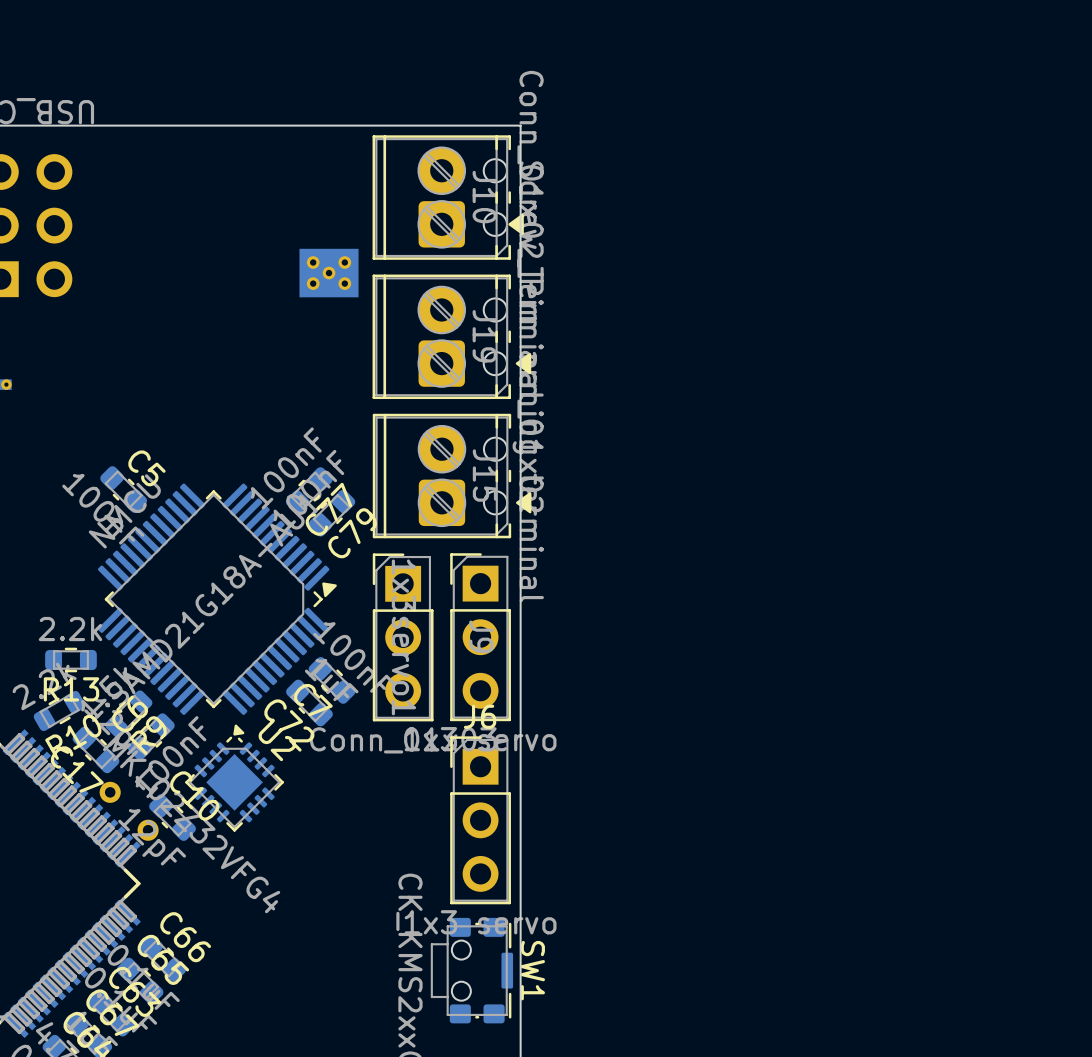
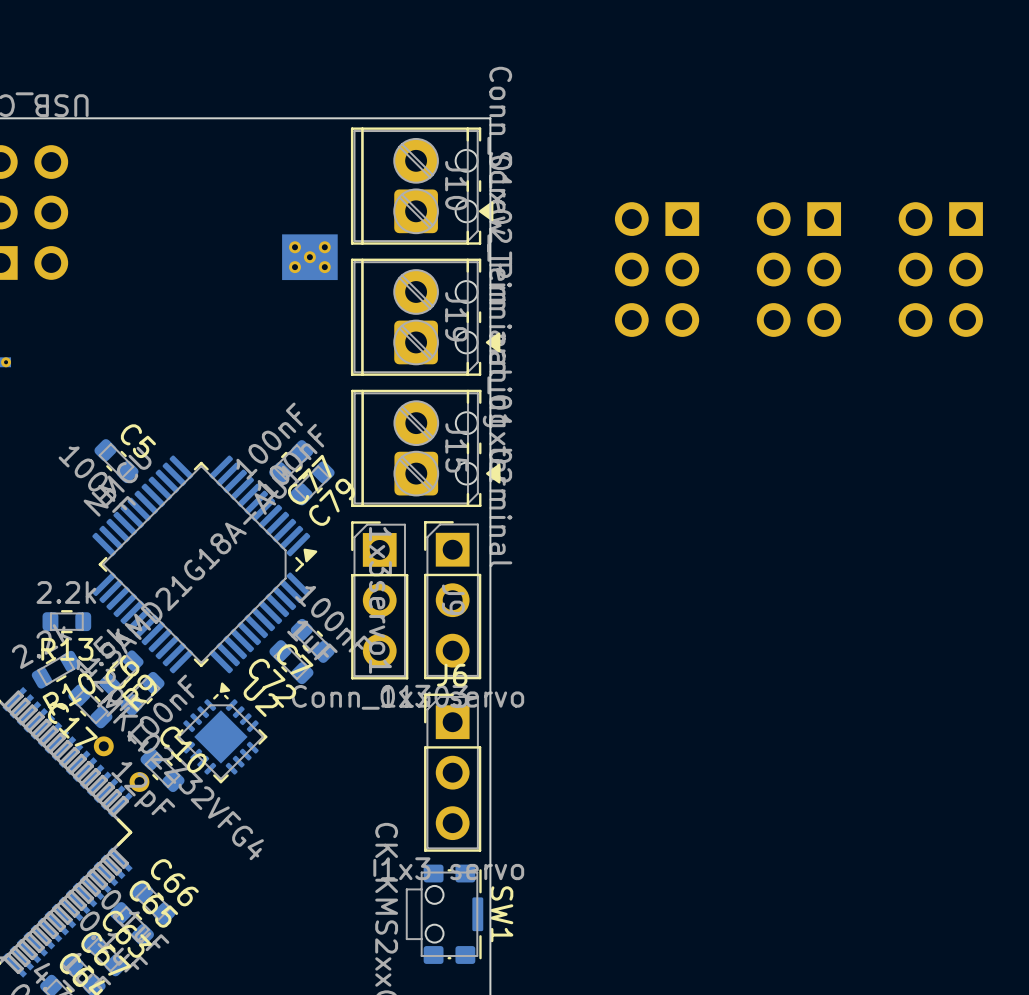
part: none -> (657, 269)
part: none -> (798, 269)
part: none -> (940, 269)

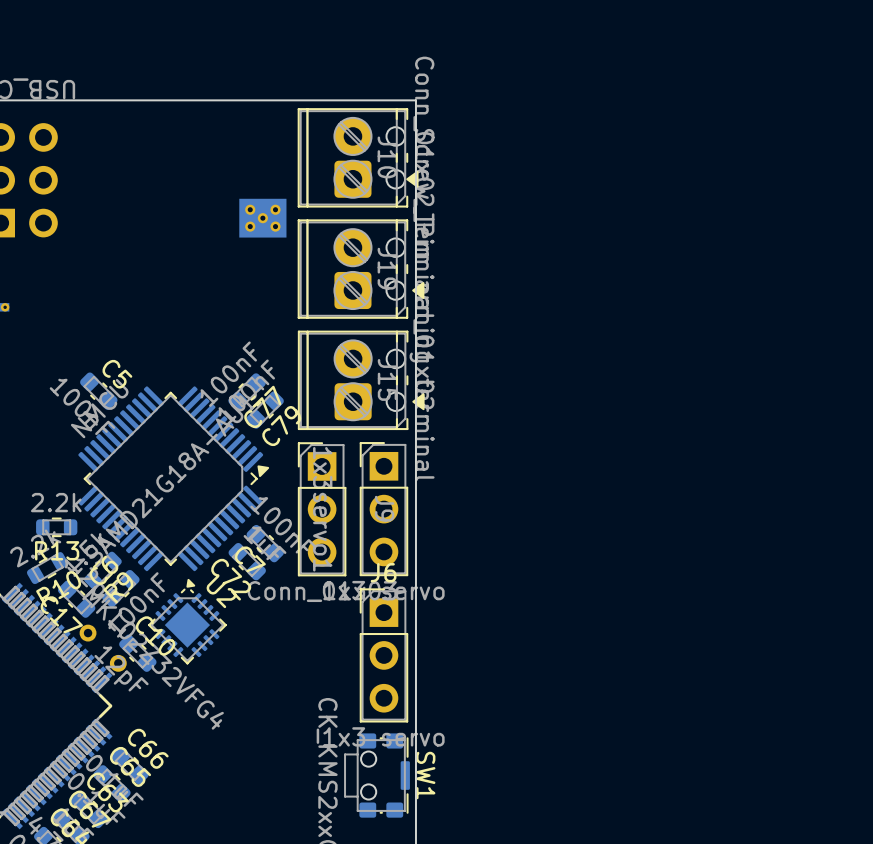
part: (657, 269) -> none
part: (798, 269) -> none
part: (940, 269) -> none

